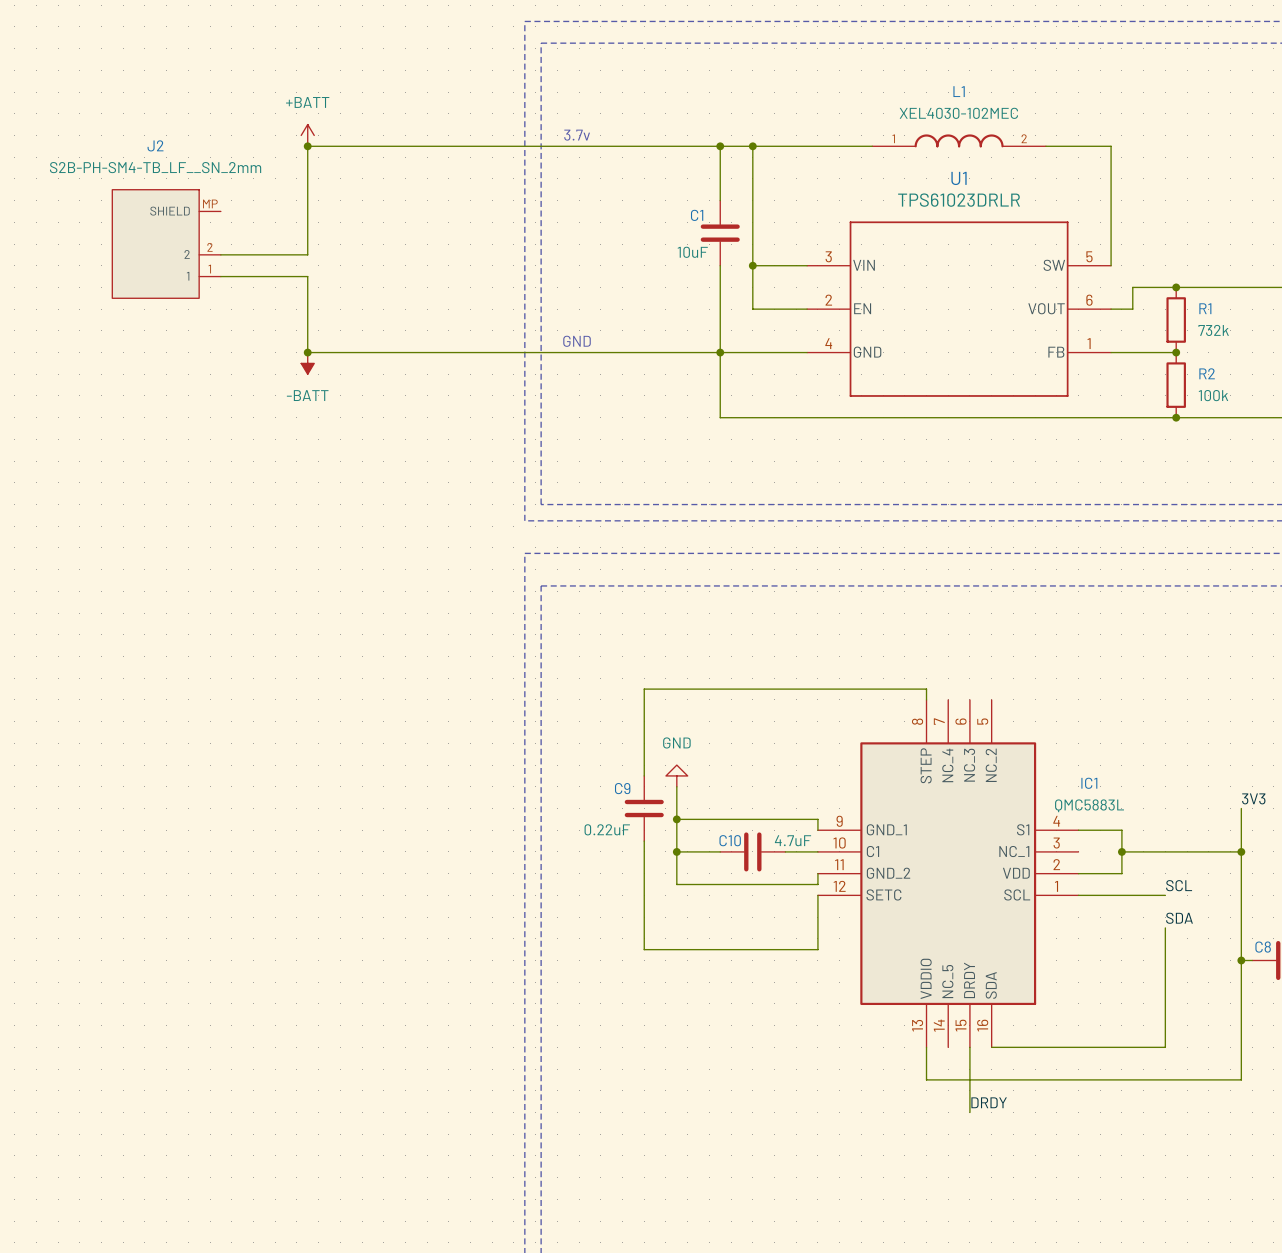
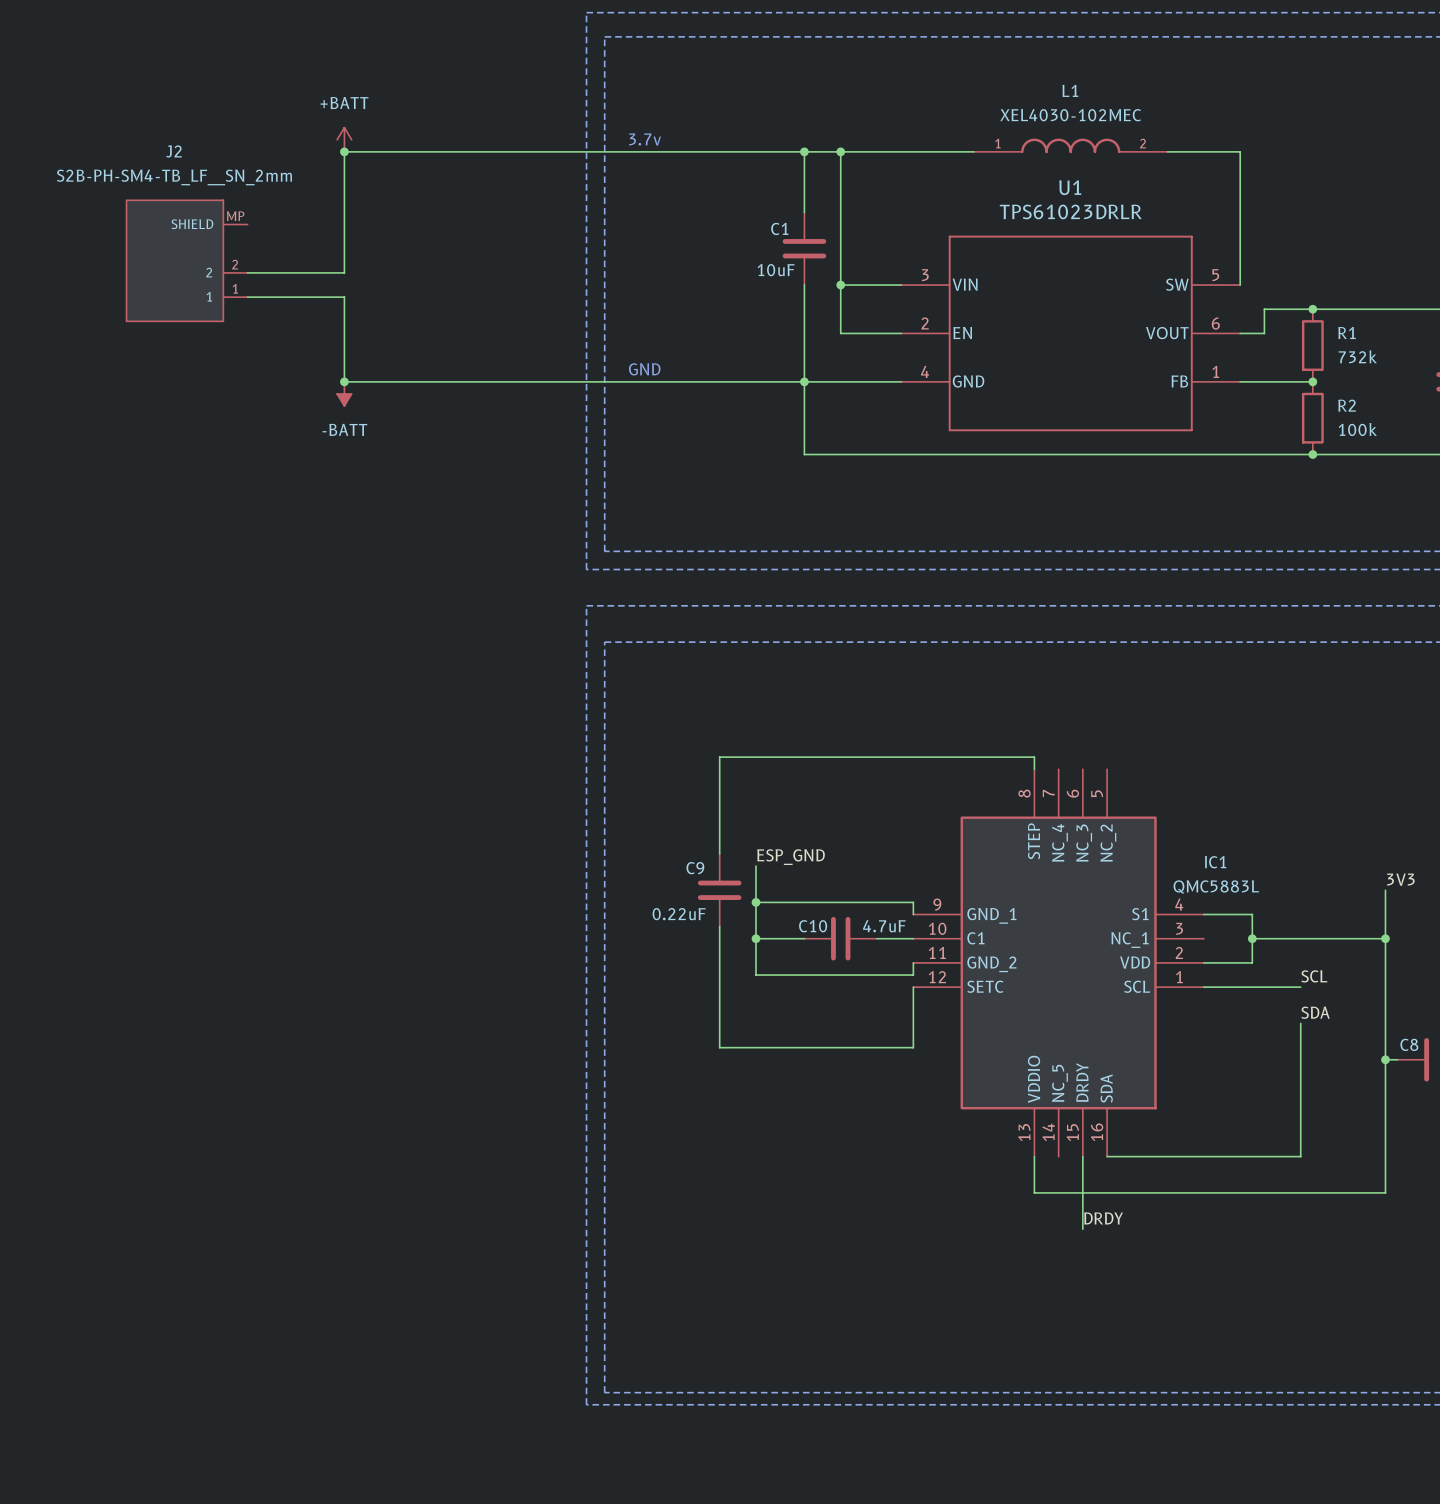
power symbol: GND (676, 775) -> none
label: none -> ESP_GND (791, 857)

